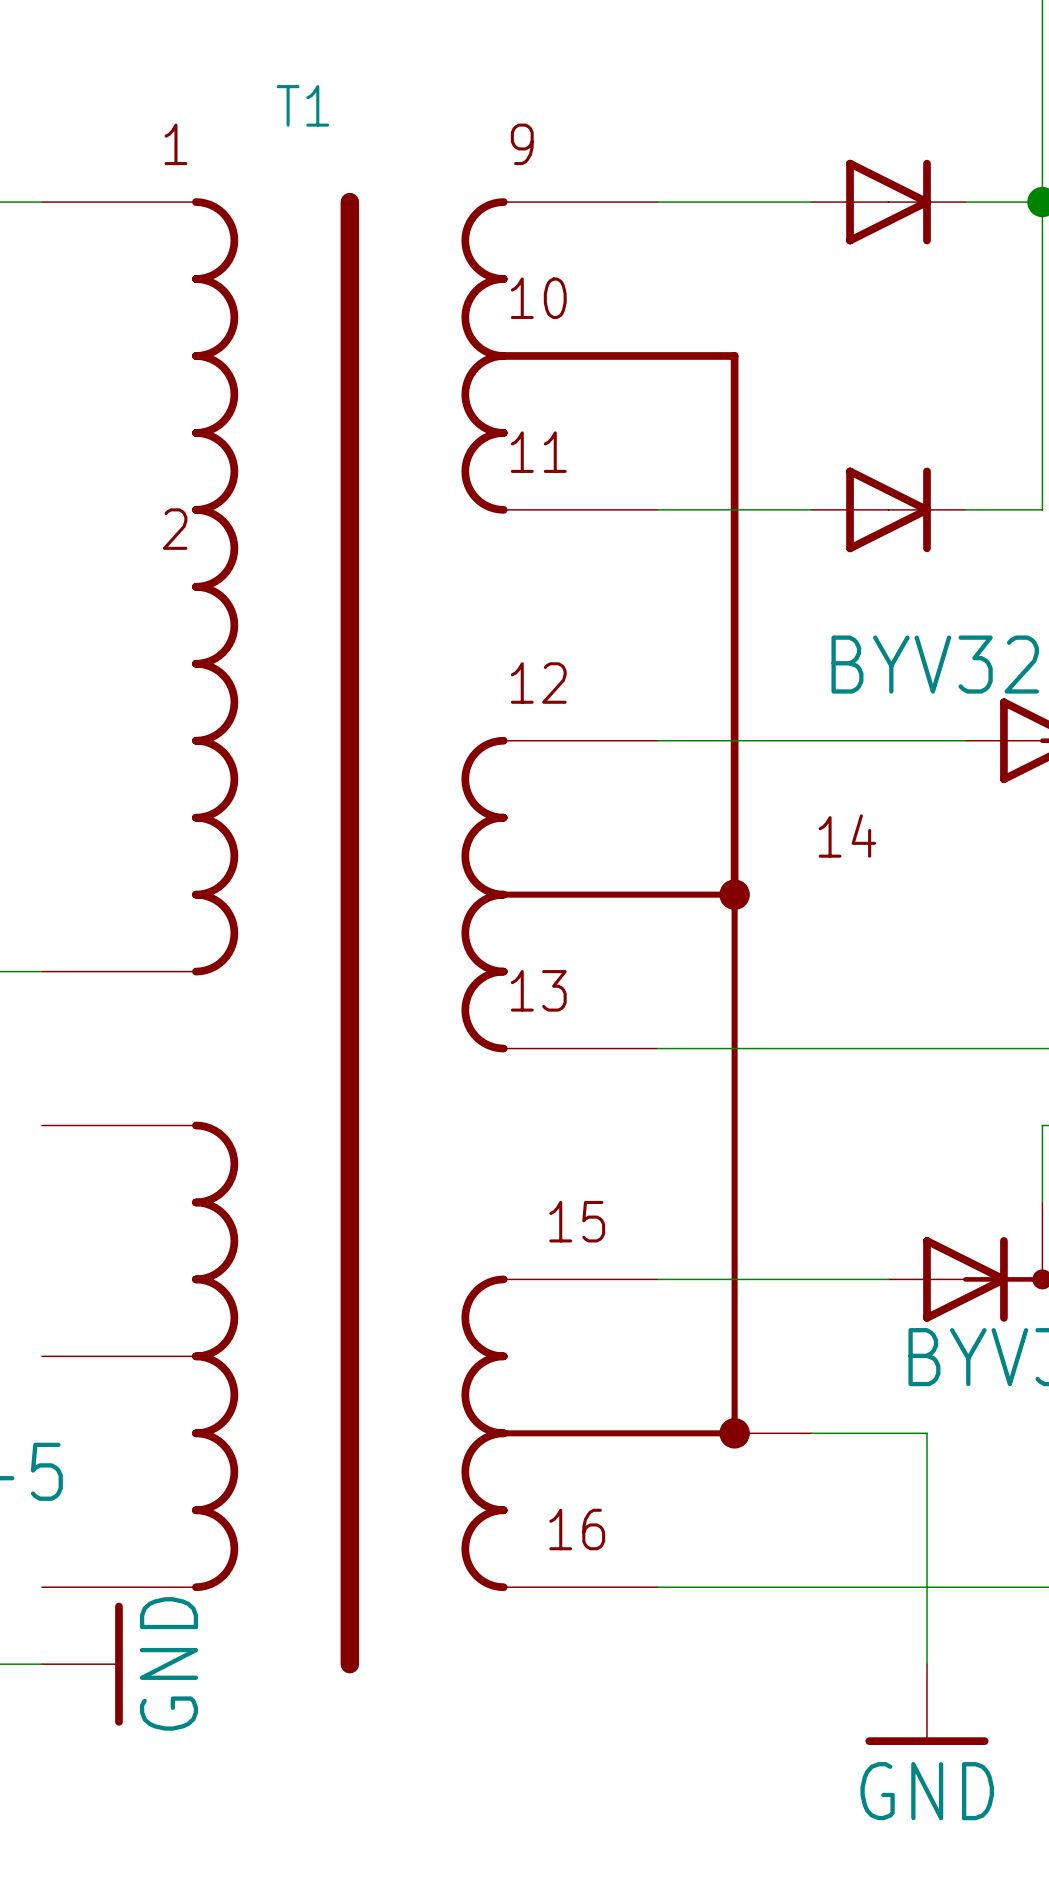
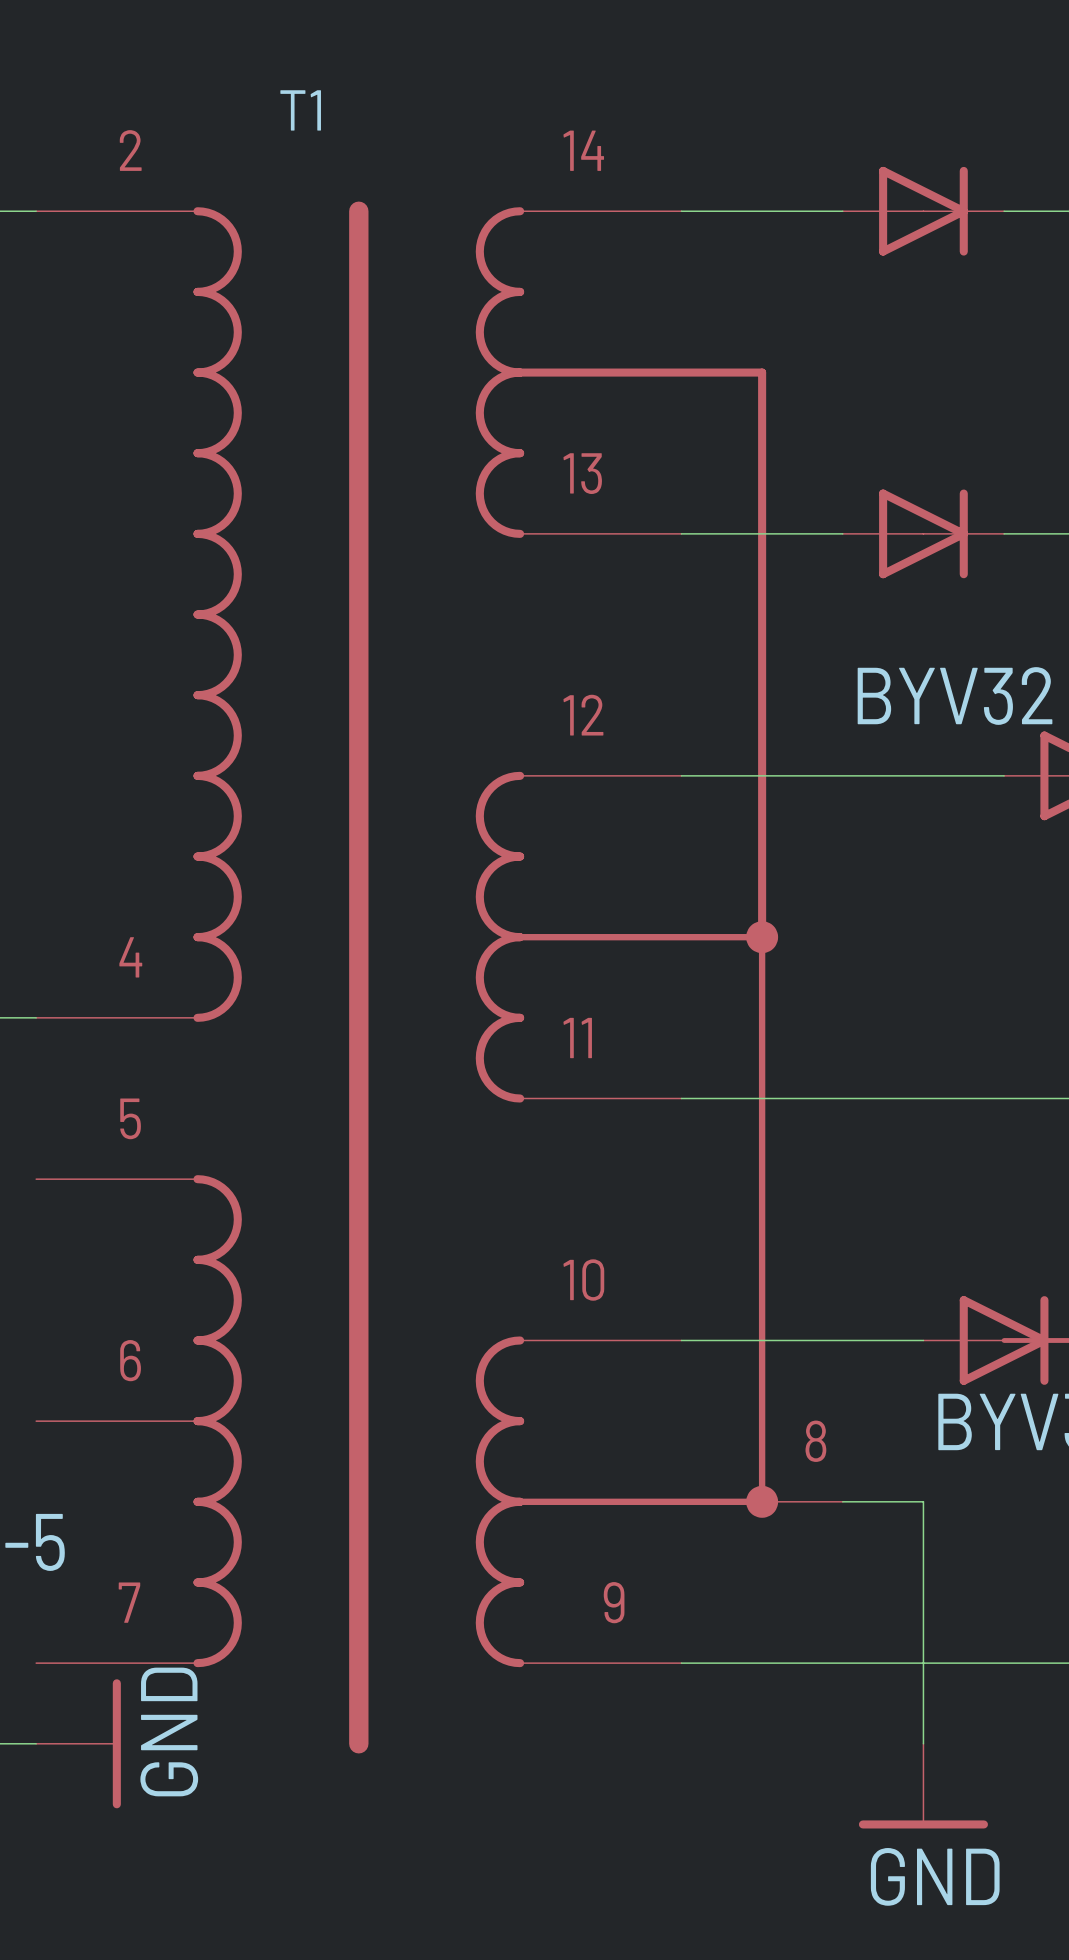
T1 symbol: [42, 192, 812, 1674] -> [36, 201, 843, 1754]
wire: (888, 1433) (926, 1433) (926, 1664) -> (923, 1501) (923, 1743)
power symbol position: GND (926, 1704) -> GND (923, 1786)

